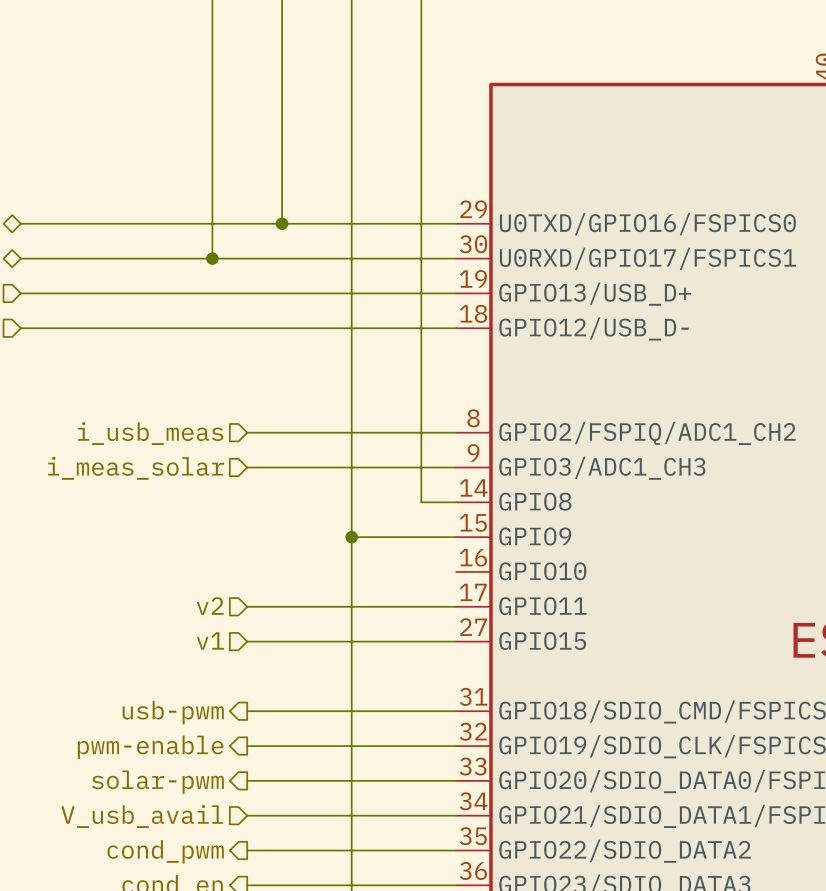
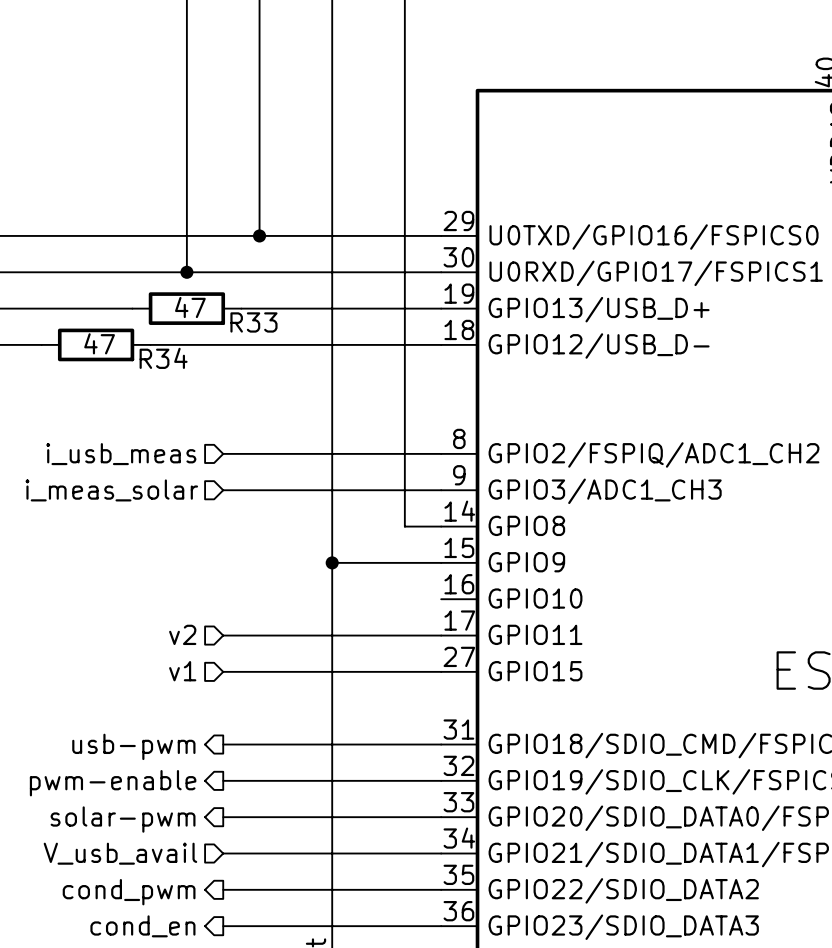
wire: (160, 293) (264, 293) -> none
R33: none -> 47 (186, 308)
wire: (73, 328) (177, 328) -> none
R34: none -> 47 (96, 344)

